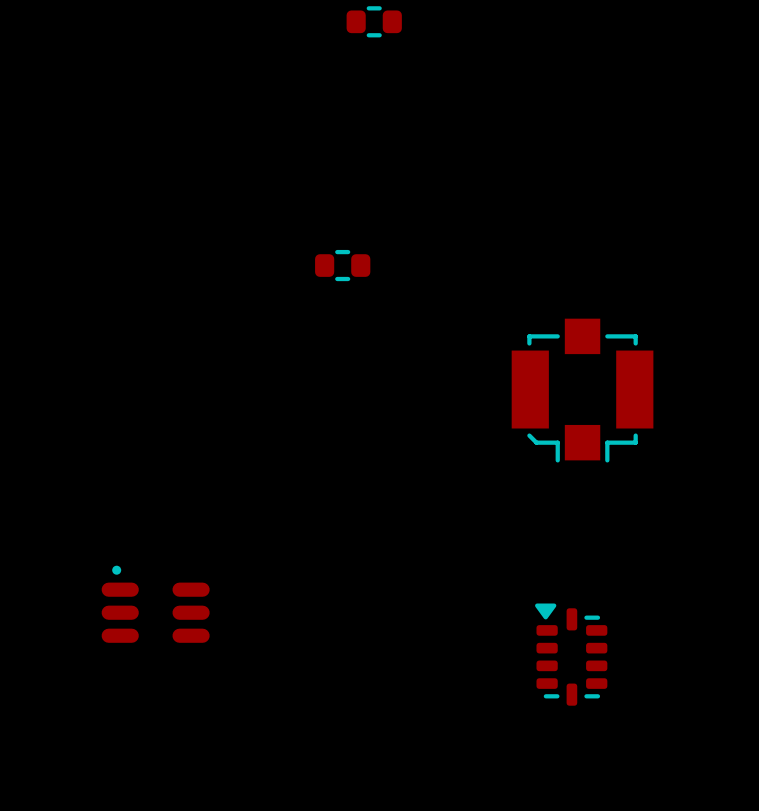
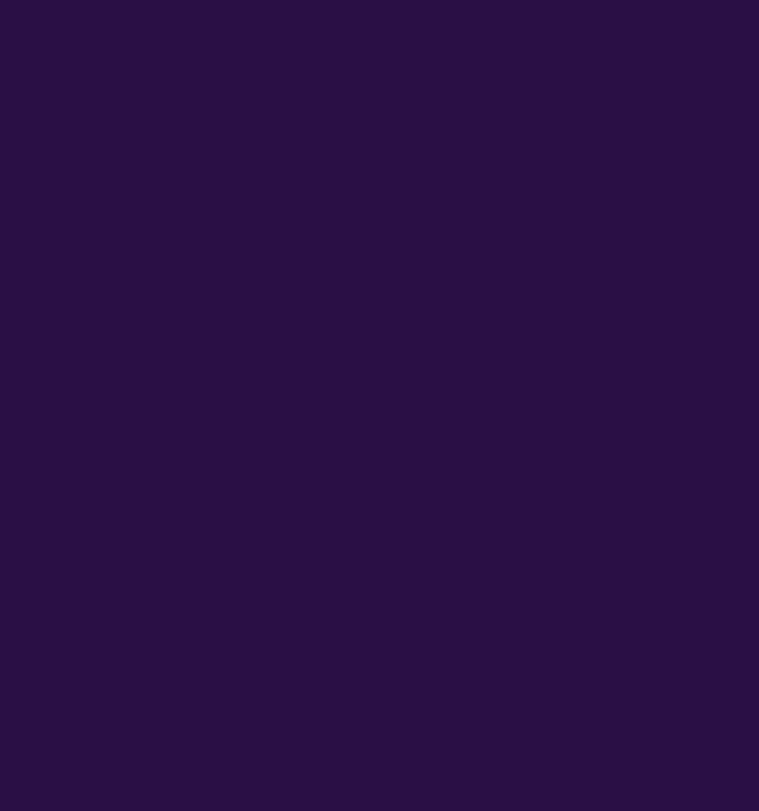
part: (374, 21) -> none
part: (342, 265) -> none
part: (582, 390) -> none
part: (155, 604) -> none
part: (571, 654) -> none

